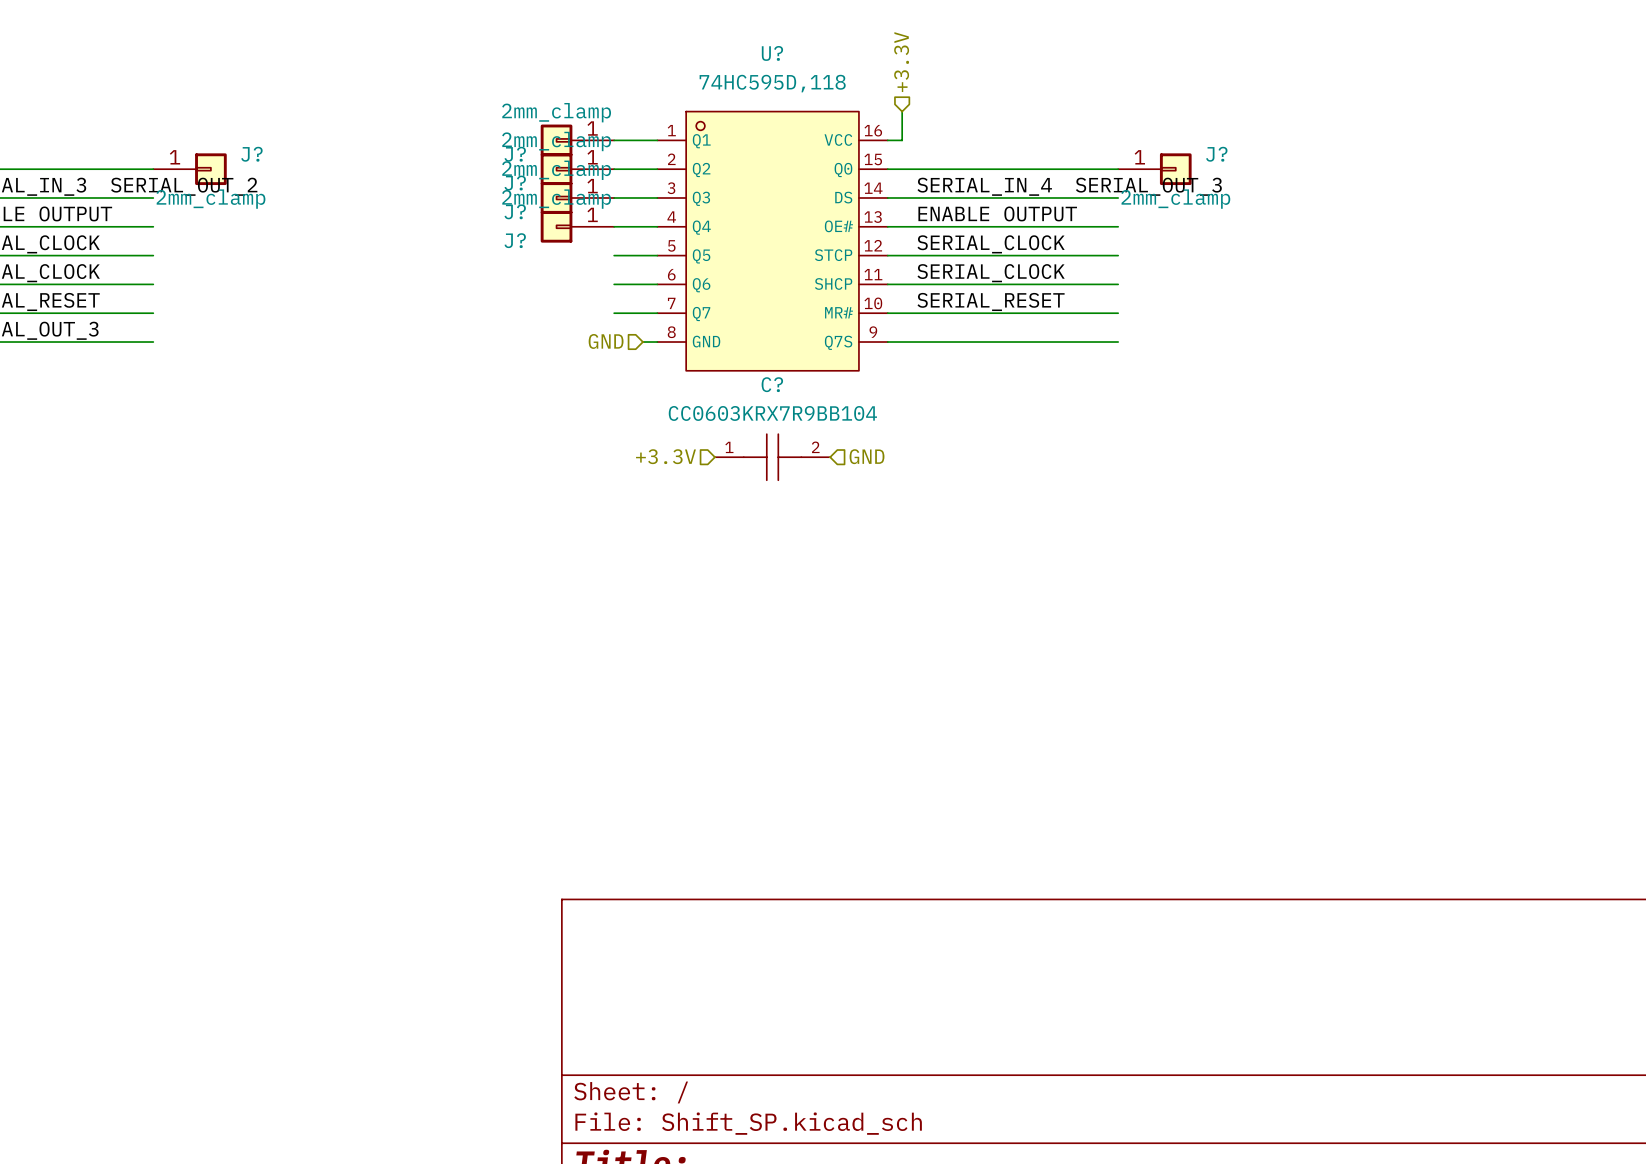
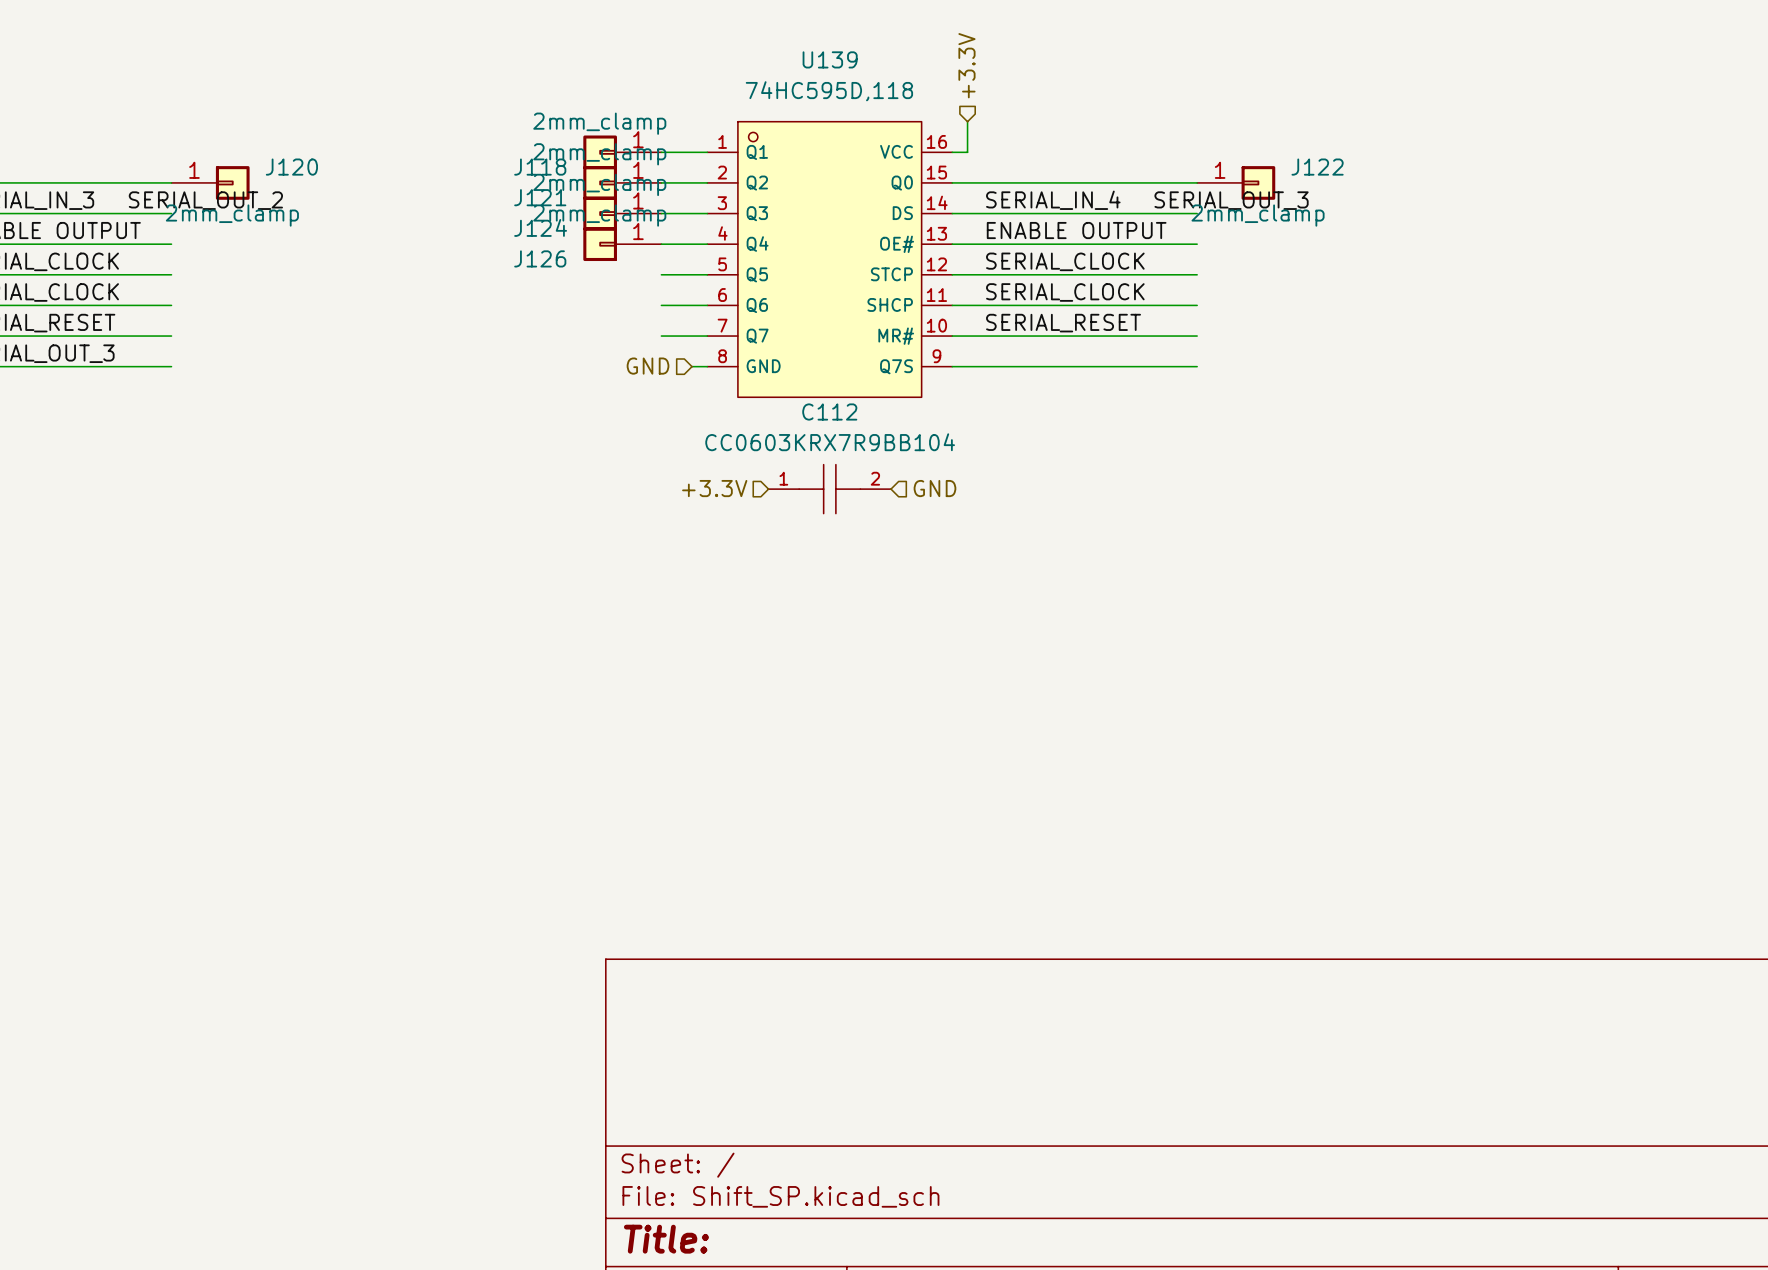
U? name: U? (772, 53) -> U139 (830, 59)
J? name: J? (251, 154) -> J120 (291, 167)
J? name: J? (515, 154) -> J118 (540, 167)
J? name: J? (1216, 154) -> J122 (1317, 167)
J? name: J? (515, 183) -> J121 (540, 197)
J? name: J? (515, 211) -> J124 (540, 227)
J? name: J? (515, 240) -> J126 (540, 258)
C? name: C? (772, 384) -> C112 (829, 412)

